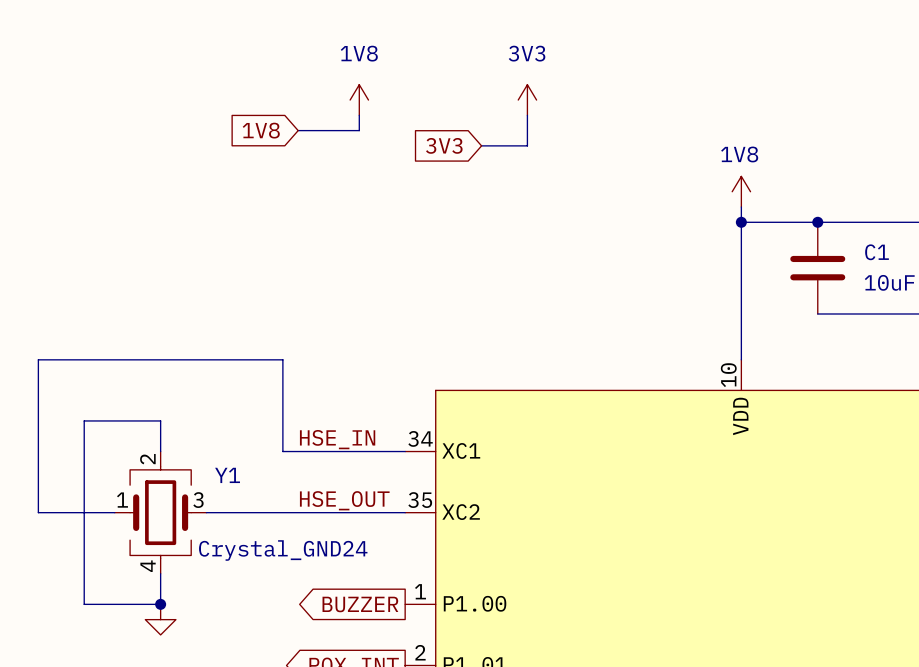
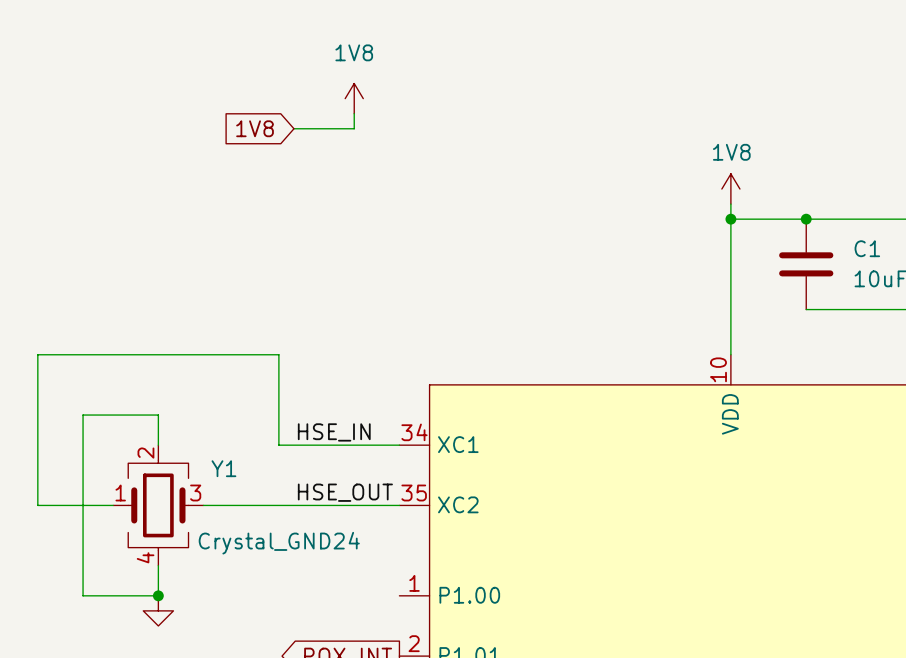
power symbol: 3V3 (527, 100) -> none
wire: (527, 115) (527, 145) (481, 145) -> none
global label: 3V3 (444, 145) -> none
global label: BUZZER (360, 604) -> none

